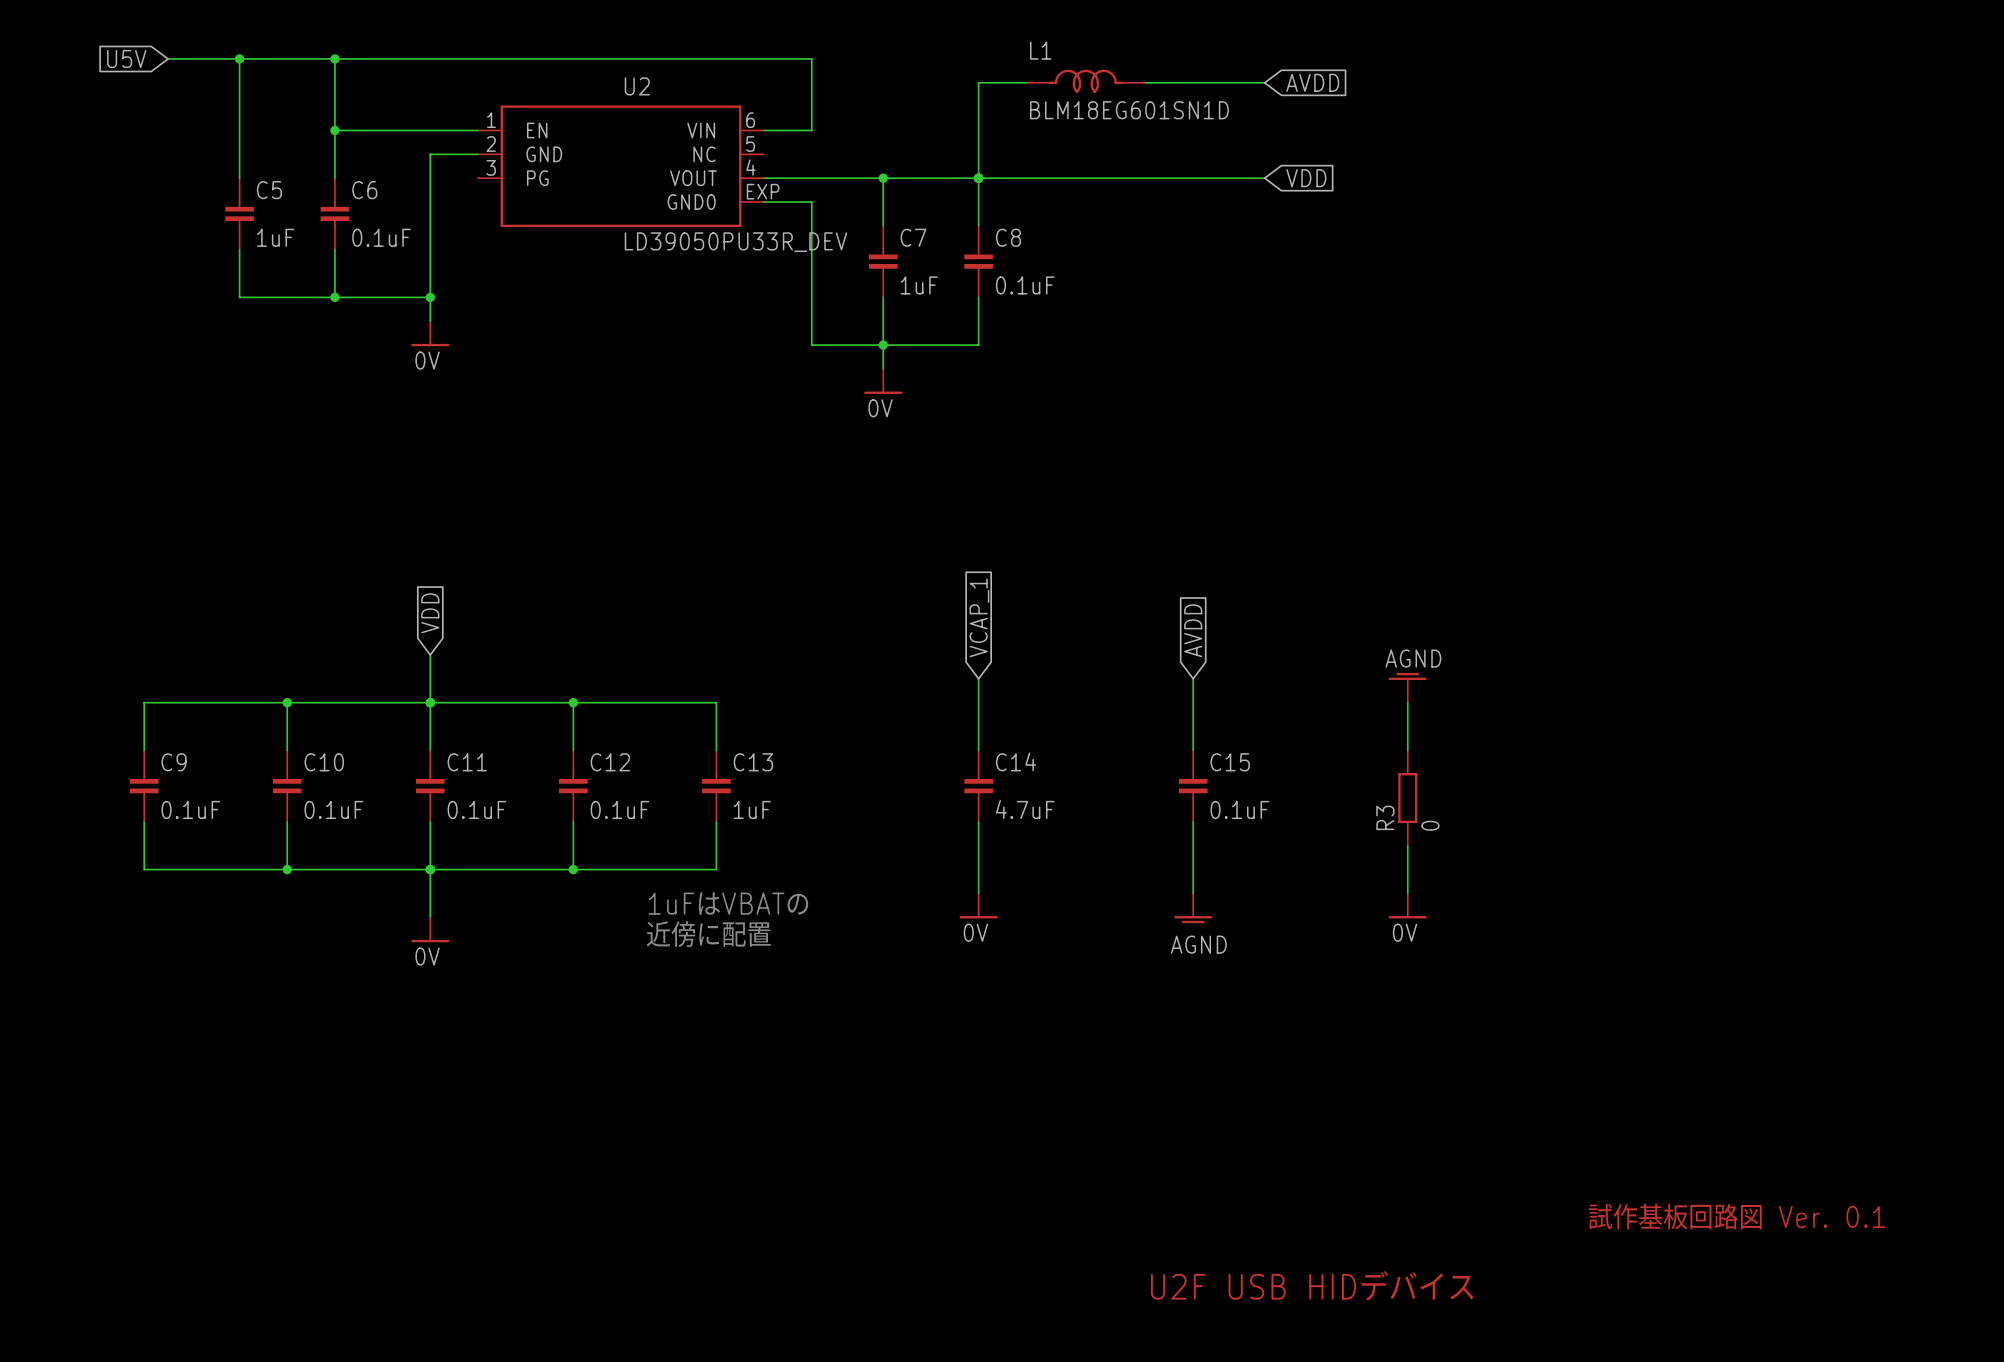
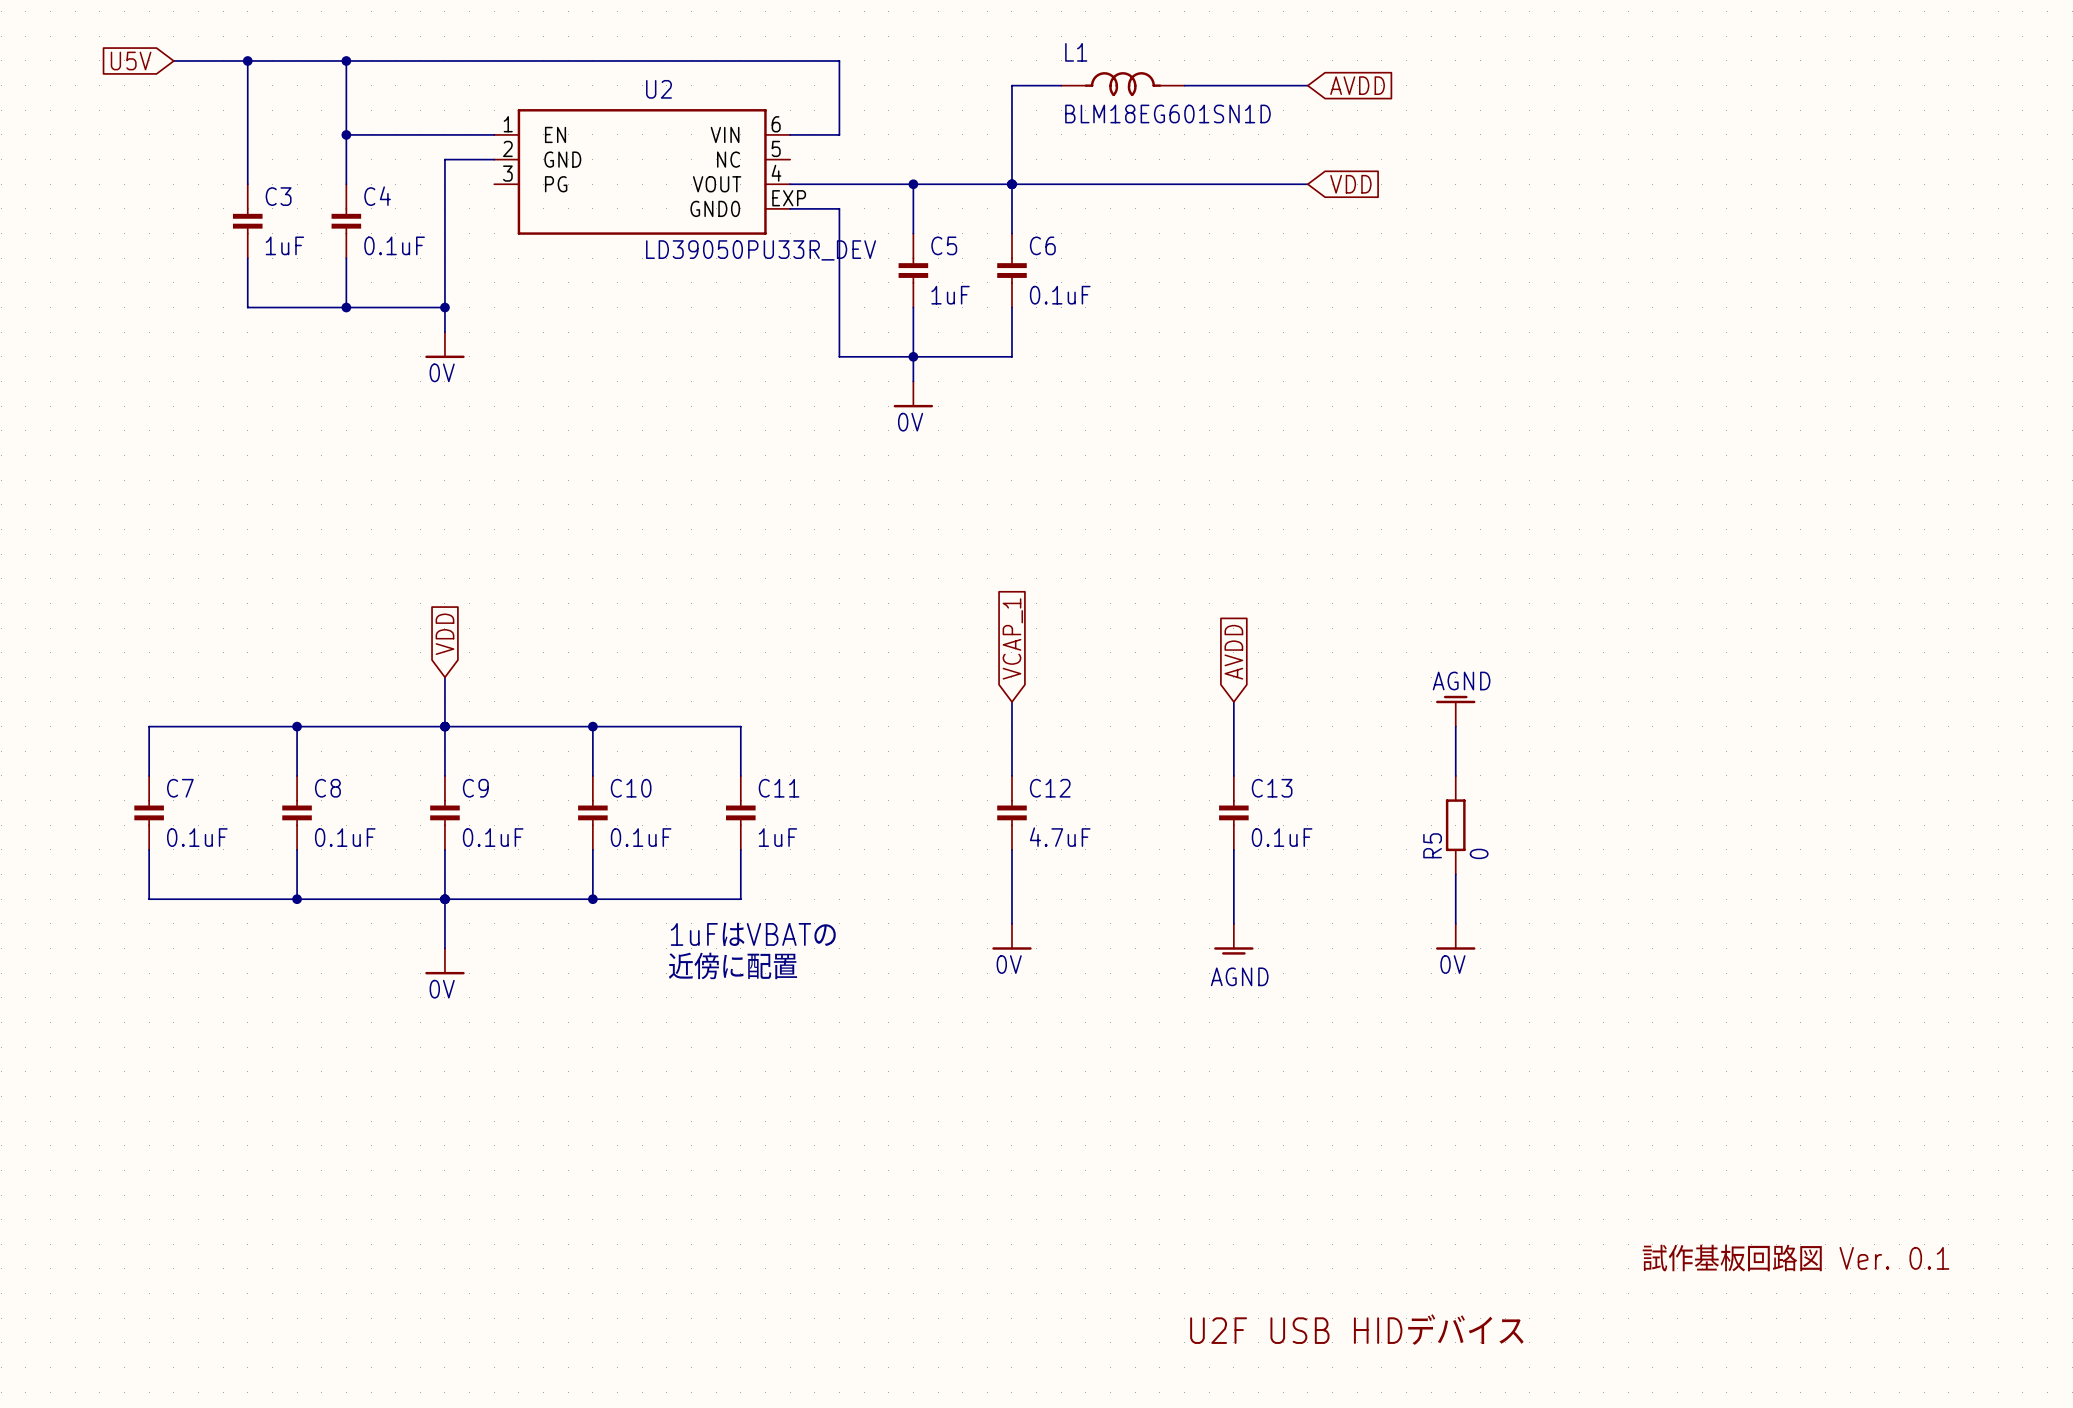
C5 name: C5 (269, 190) -> C3 (278, 196)
C6 name: C6 (364, 190) -> C4 (377, 196)
C7 name: C7 (913, 237) -> C5 (944, 245)
C8 name: C8 (1008, 237) -> C6 (1042, 245)
C14 name: C14 (1015, 761) -> C12 (1050, 788)
C9 name: C9 (174, 762) -> C7 (180, 788)
C10 name: C10 (324, 762) -> C8 (327, 788)
C11 name: C11 (467, 762) -> C9 (475, 788)
C12 name: C12 (610, 762) -> C10 (631, 788)
C13 name: C13 (753, 762) -> C11 (779, 788)
C15 name: C15 (1230, 762) -> C13 (1272, 788)
R3 name: R3 (1385, 817) -> R5 (1432, 845)

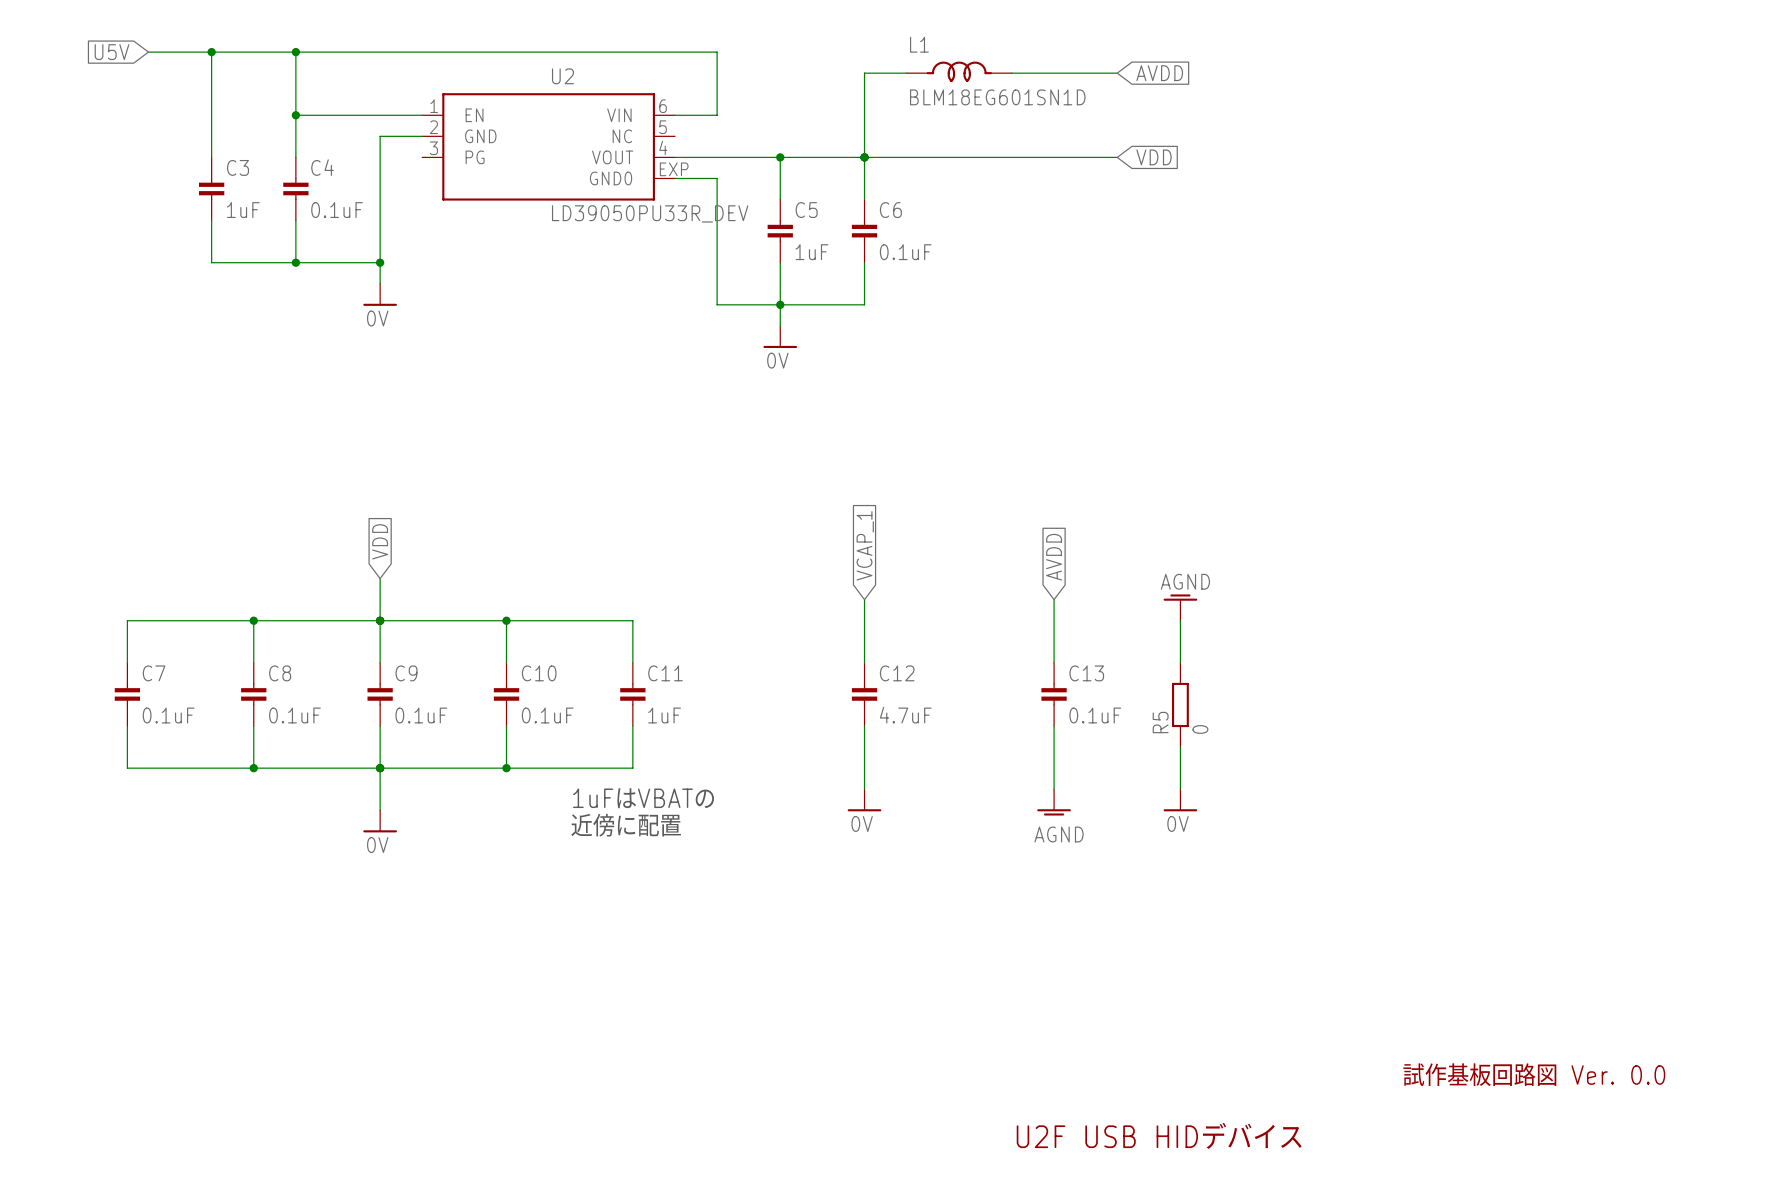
power symbol position: AGND (1455, 711) -> AGND (1180, 607)
wire: (1455, 726) (1455, 775) -> (1180, 620) (1180, 662)
R5 position: (1455, 825) -> (1180, 704)
wire: (1455, 874) (1455, 923) -> (1180, 747) (1180, 789)
power symbol position: 0V (1455, 936) -> 0V (1180, 800)
text: 試作基板回路図 Ver. 0.1 (1795, 1258) -> 試作基板回路図 Ver. 0.0 (1533, 1074)

